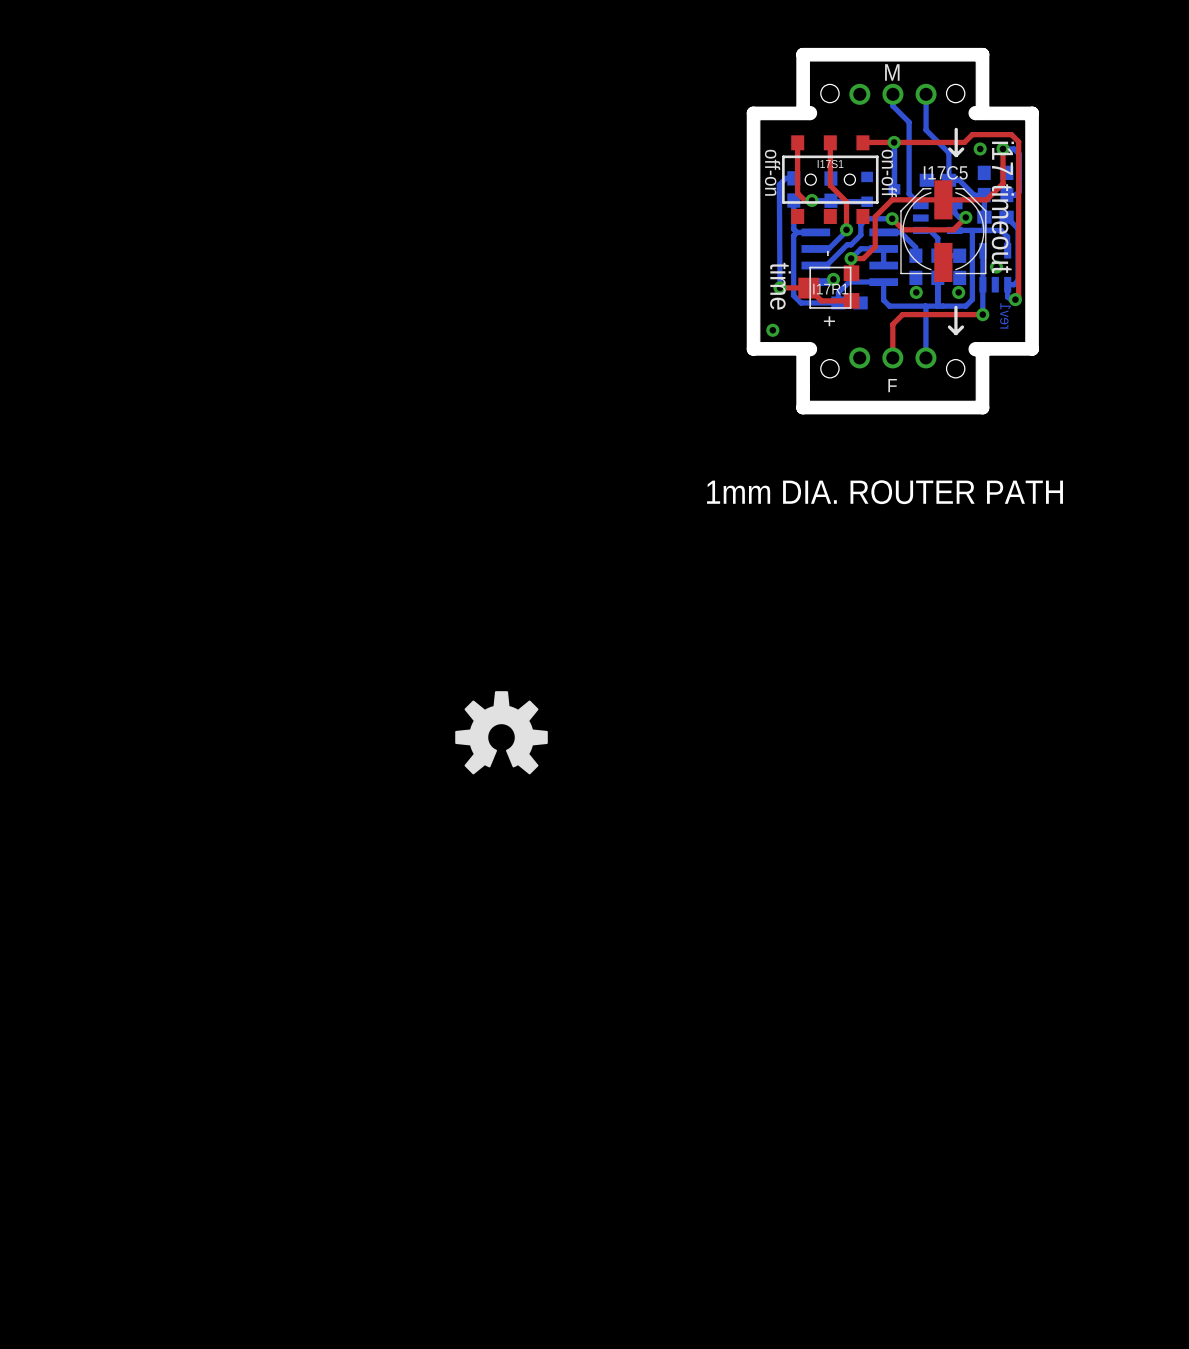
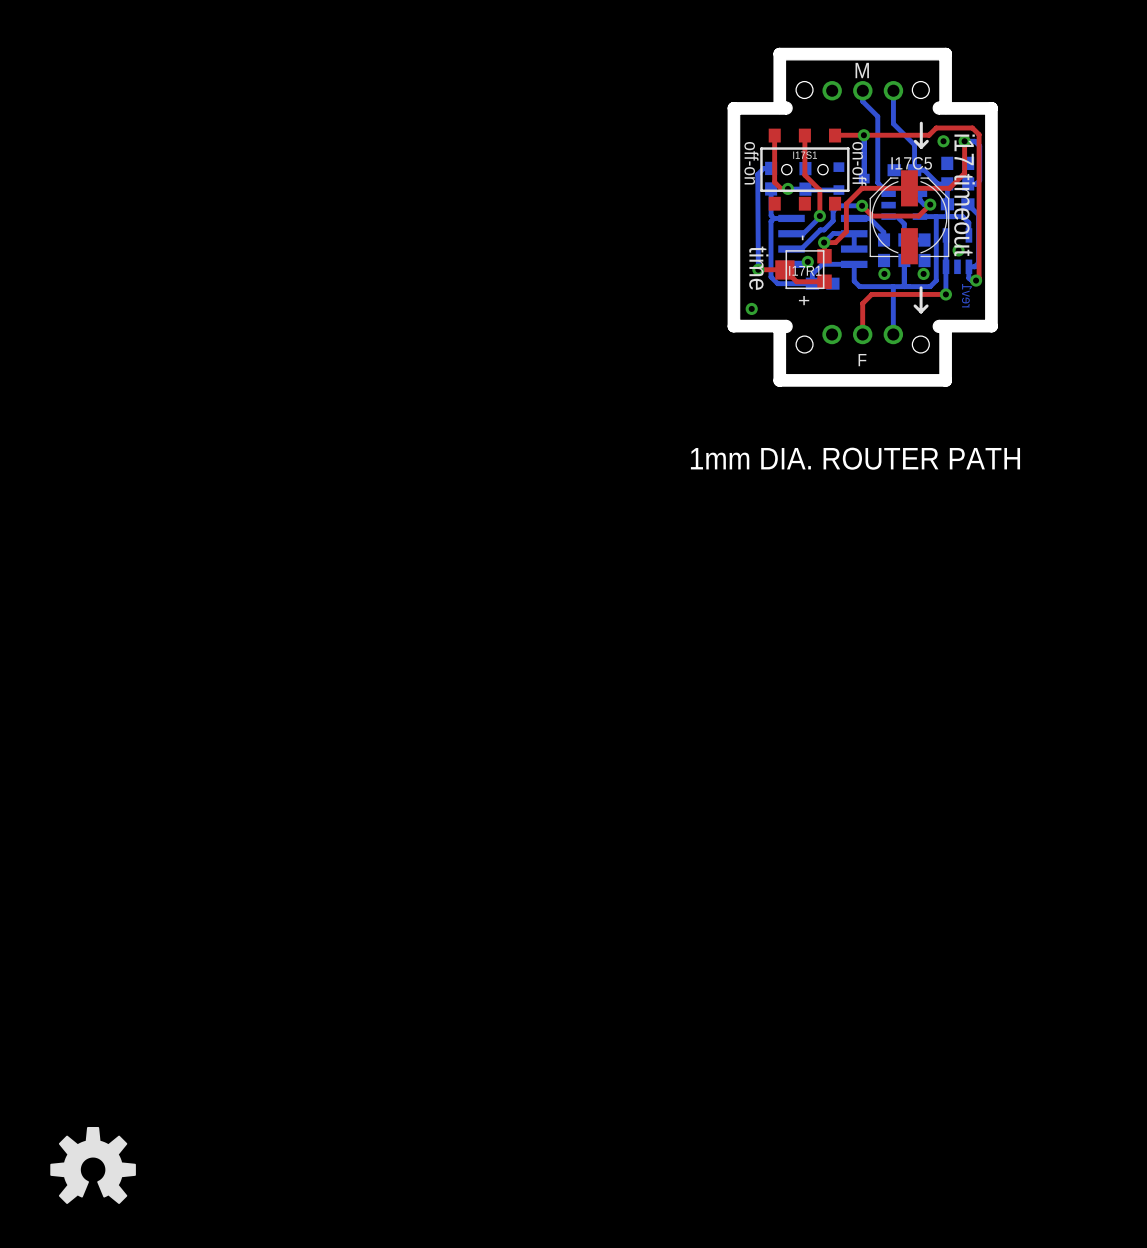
drawing: [455, 691, 548, 775] -> none
drawing: none -> [50, 1127, 136, 1204]

